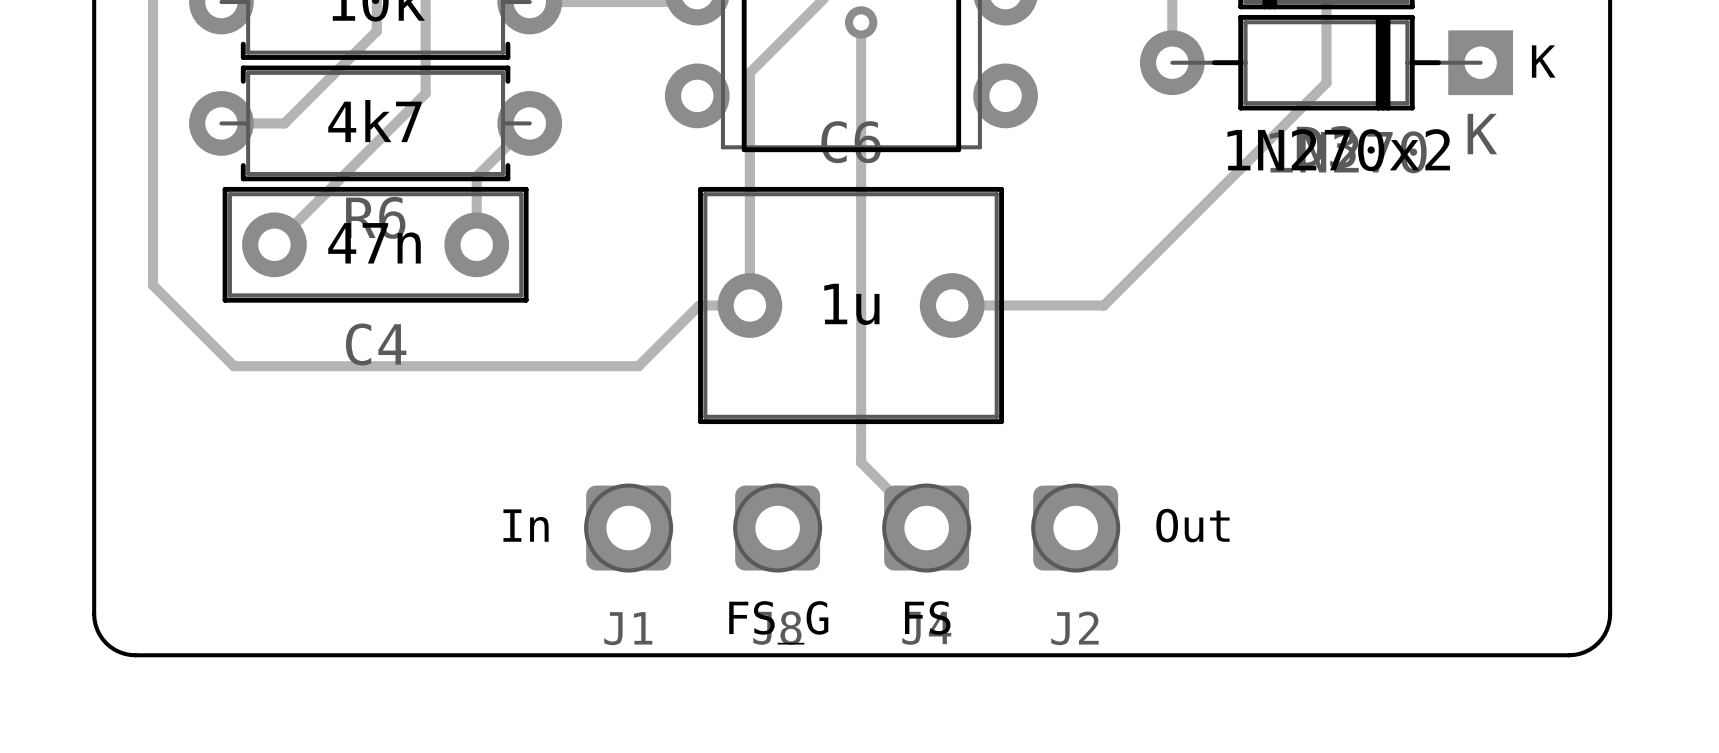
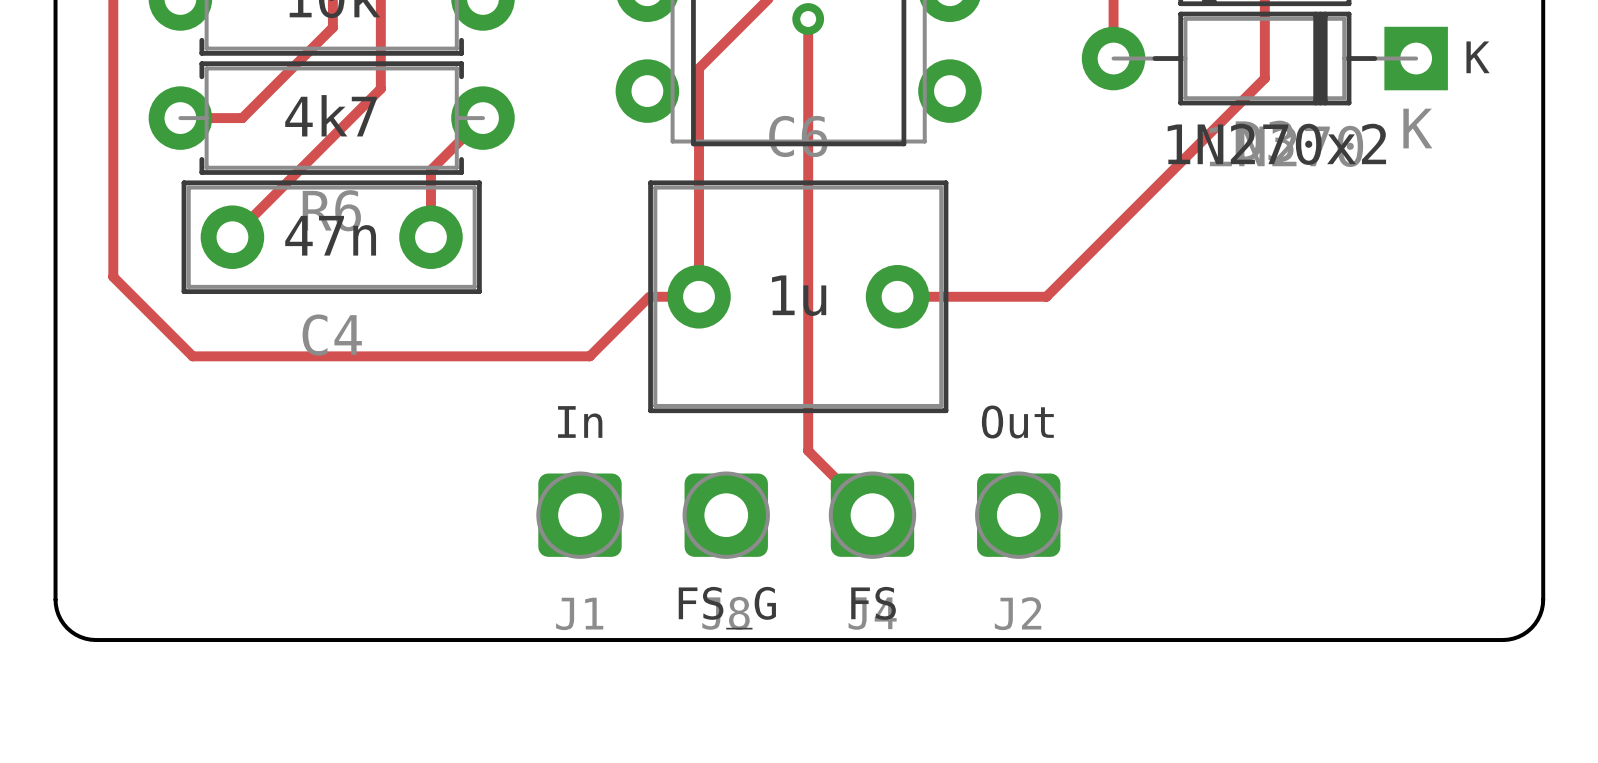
J1 value position: In (526, 525) -> In (580, 421)
J2 value position: Out (1192, 525) -> Out (1017, 422)

